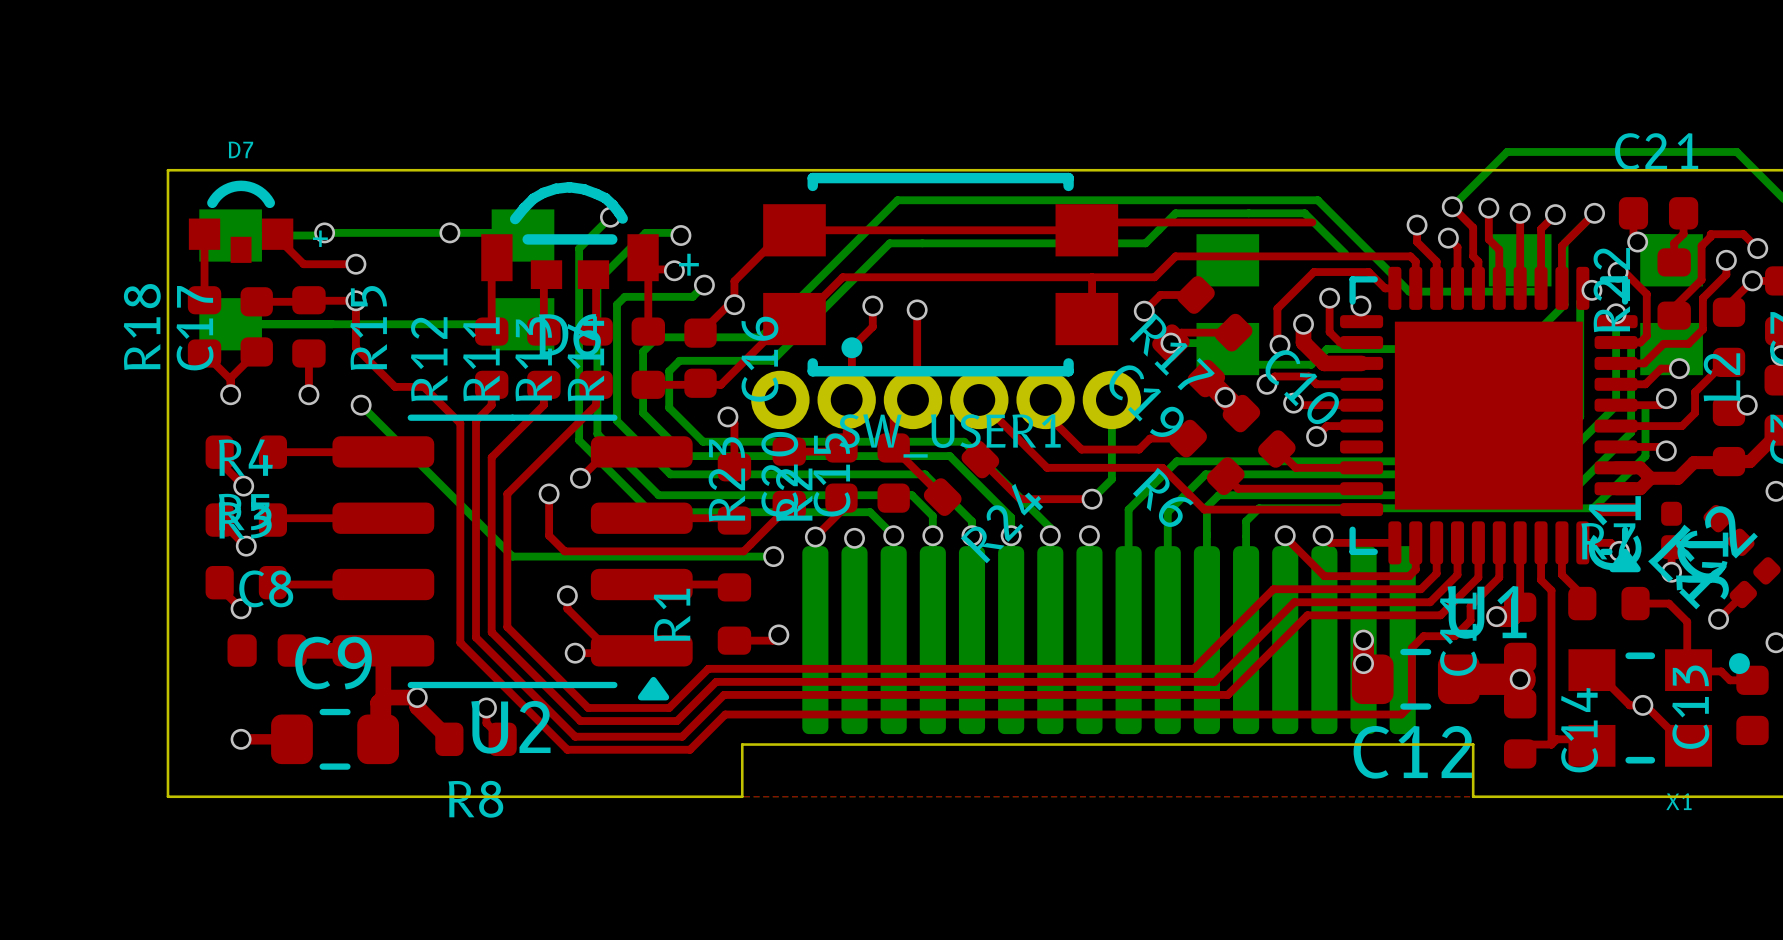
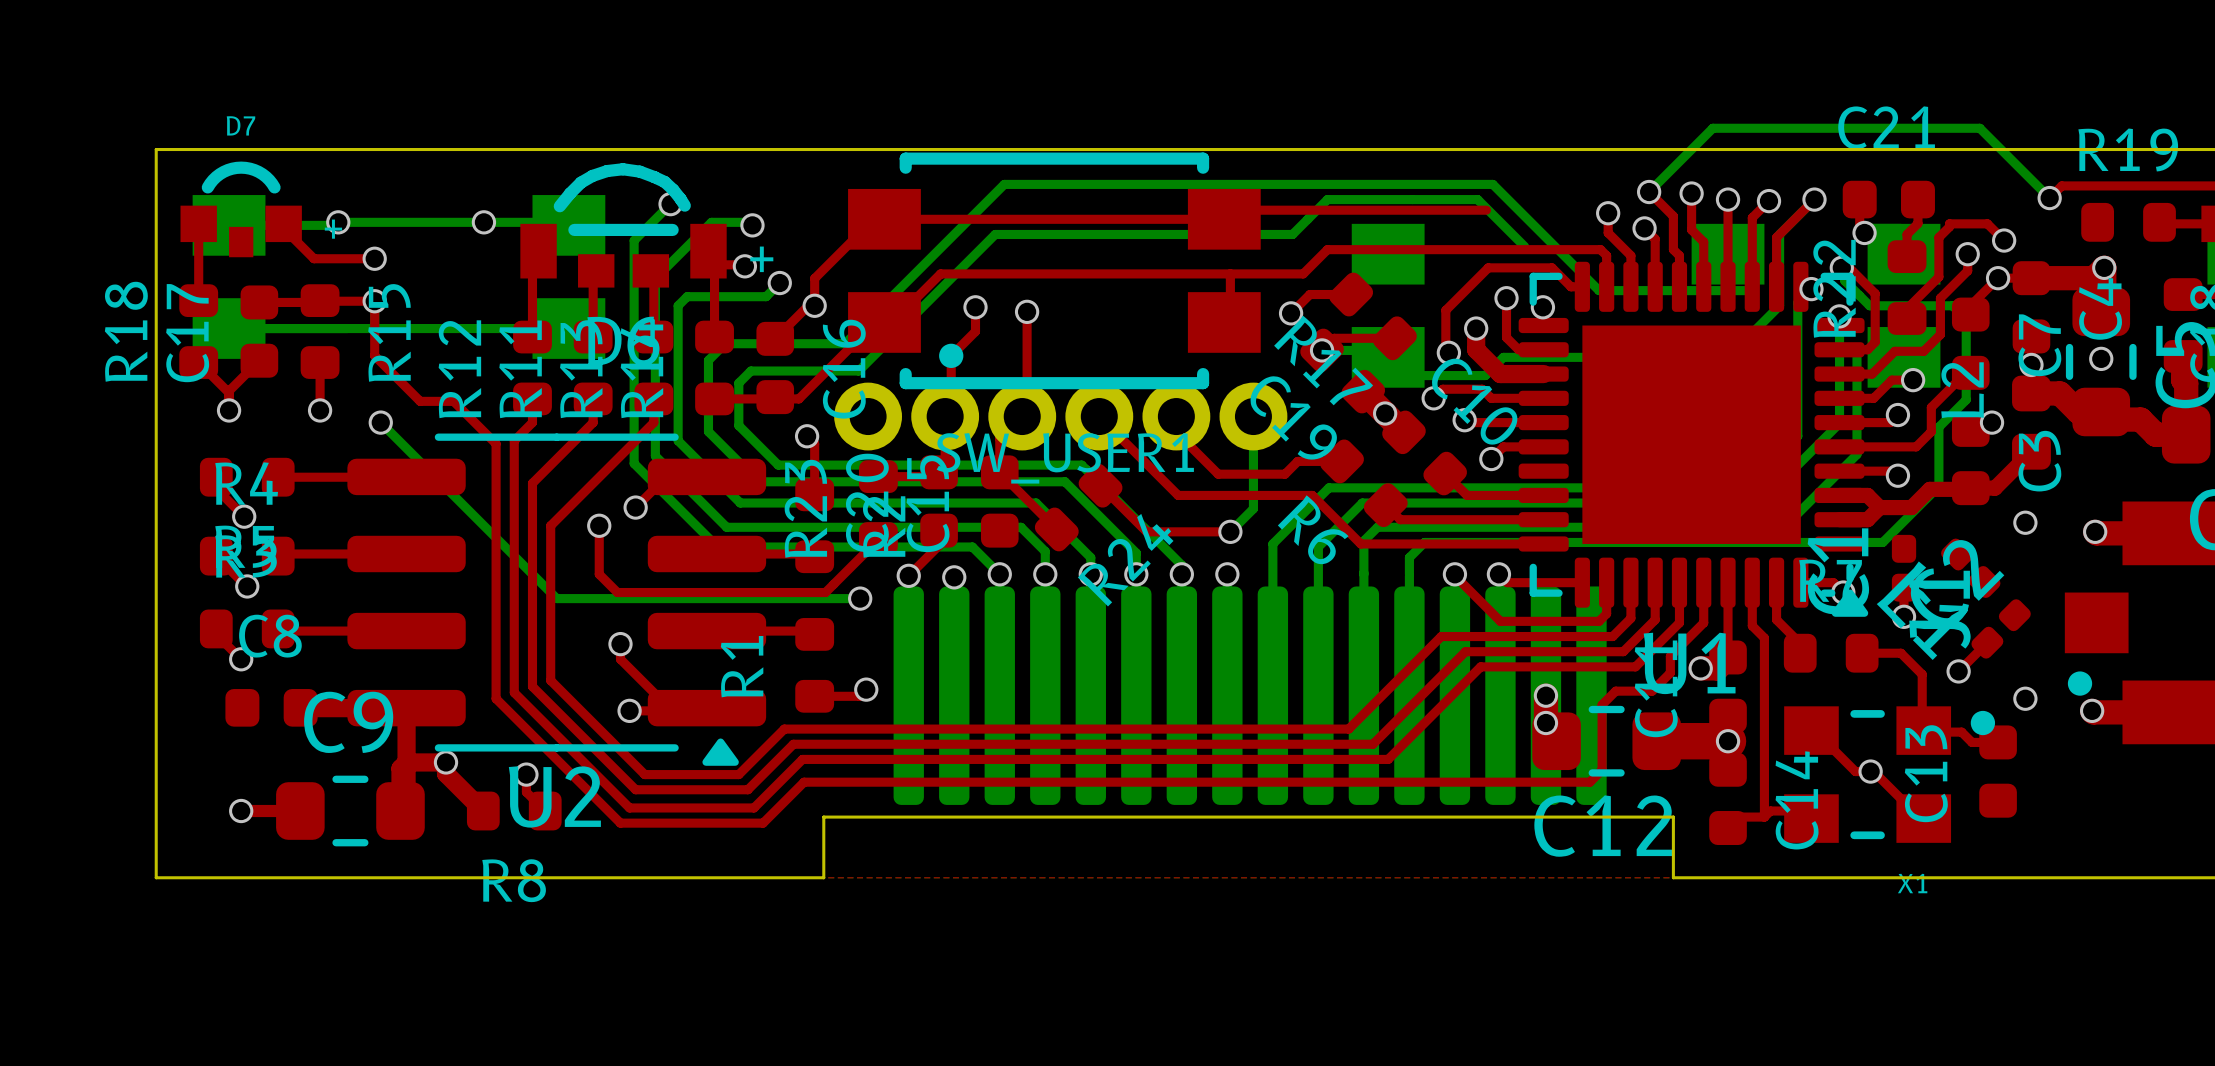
bottom track: (1645, 407) (1645, 456) (1593, 508) -> (1844, 270) (1844, 280) (1869, 305) (1952, 305) (1966, 319) (1966, 399) (1938, 427) (1938, 486) (1882, 542) (1812, 542)

